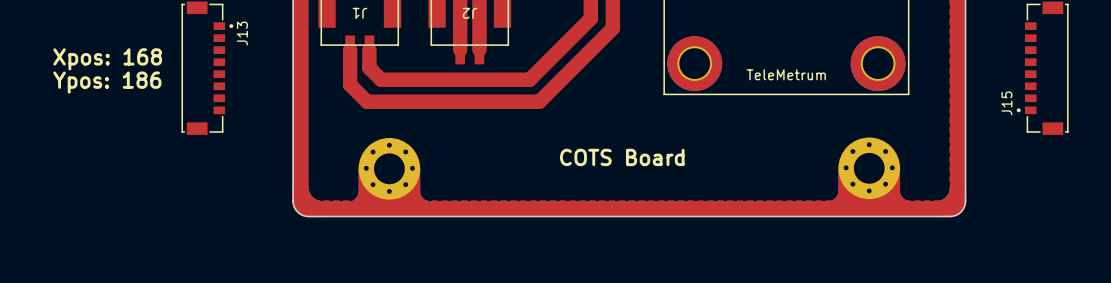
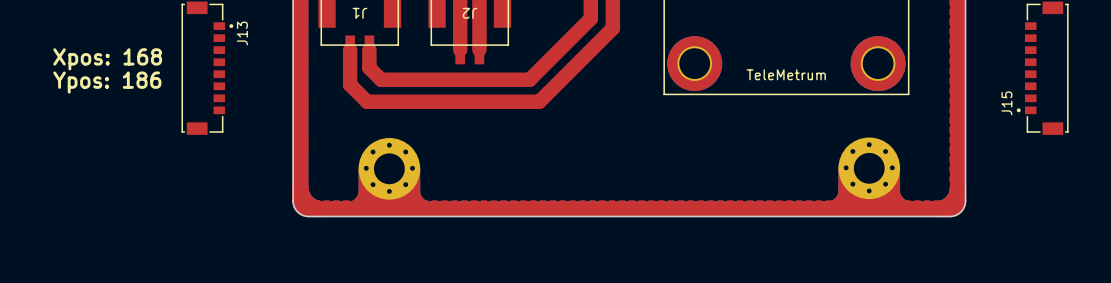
text: COTS Board (622, 157) -> none

